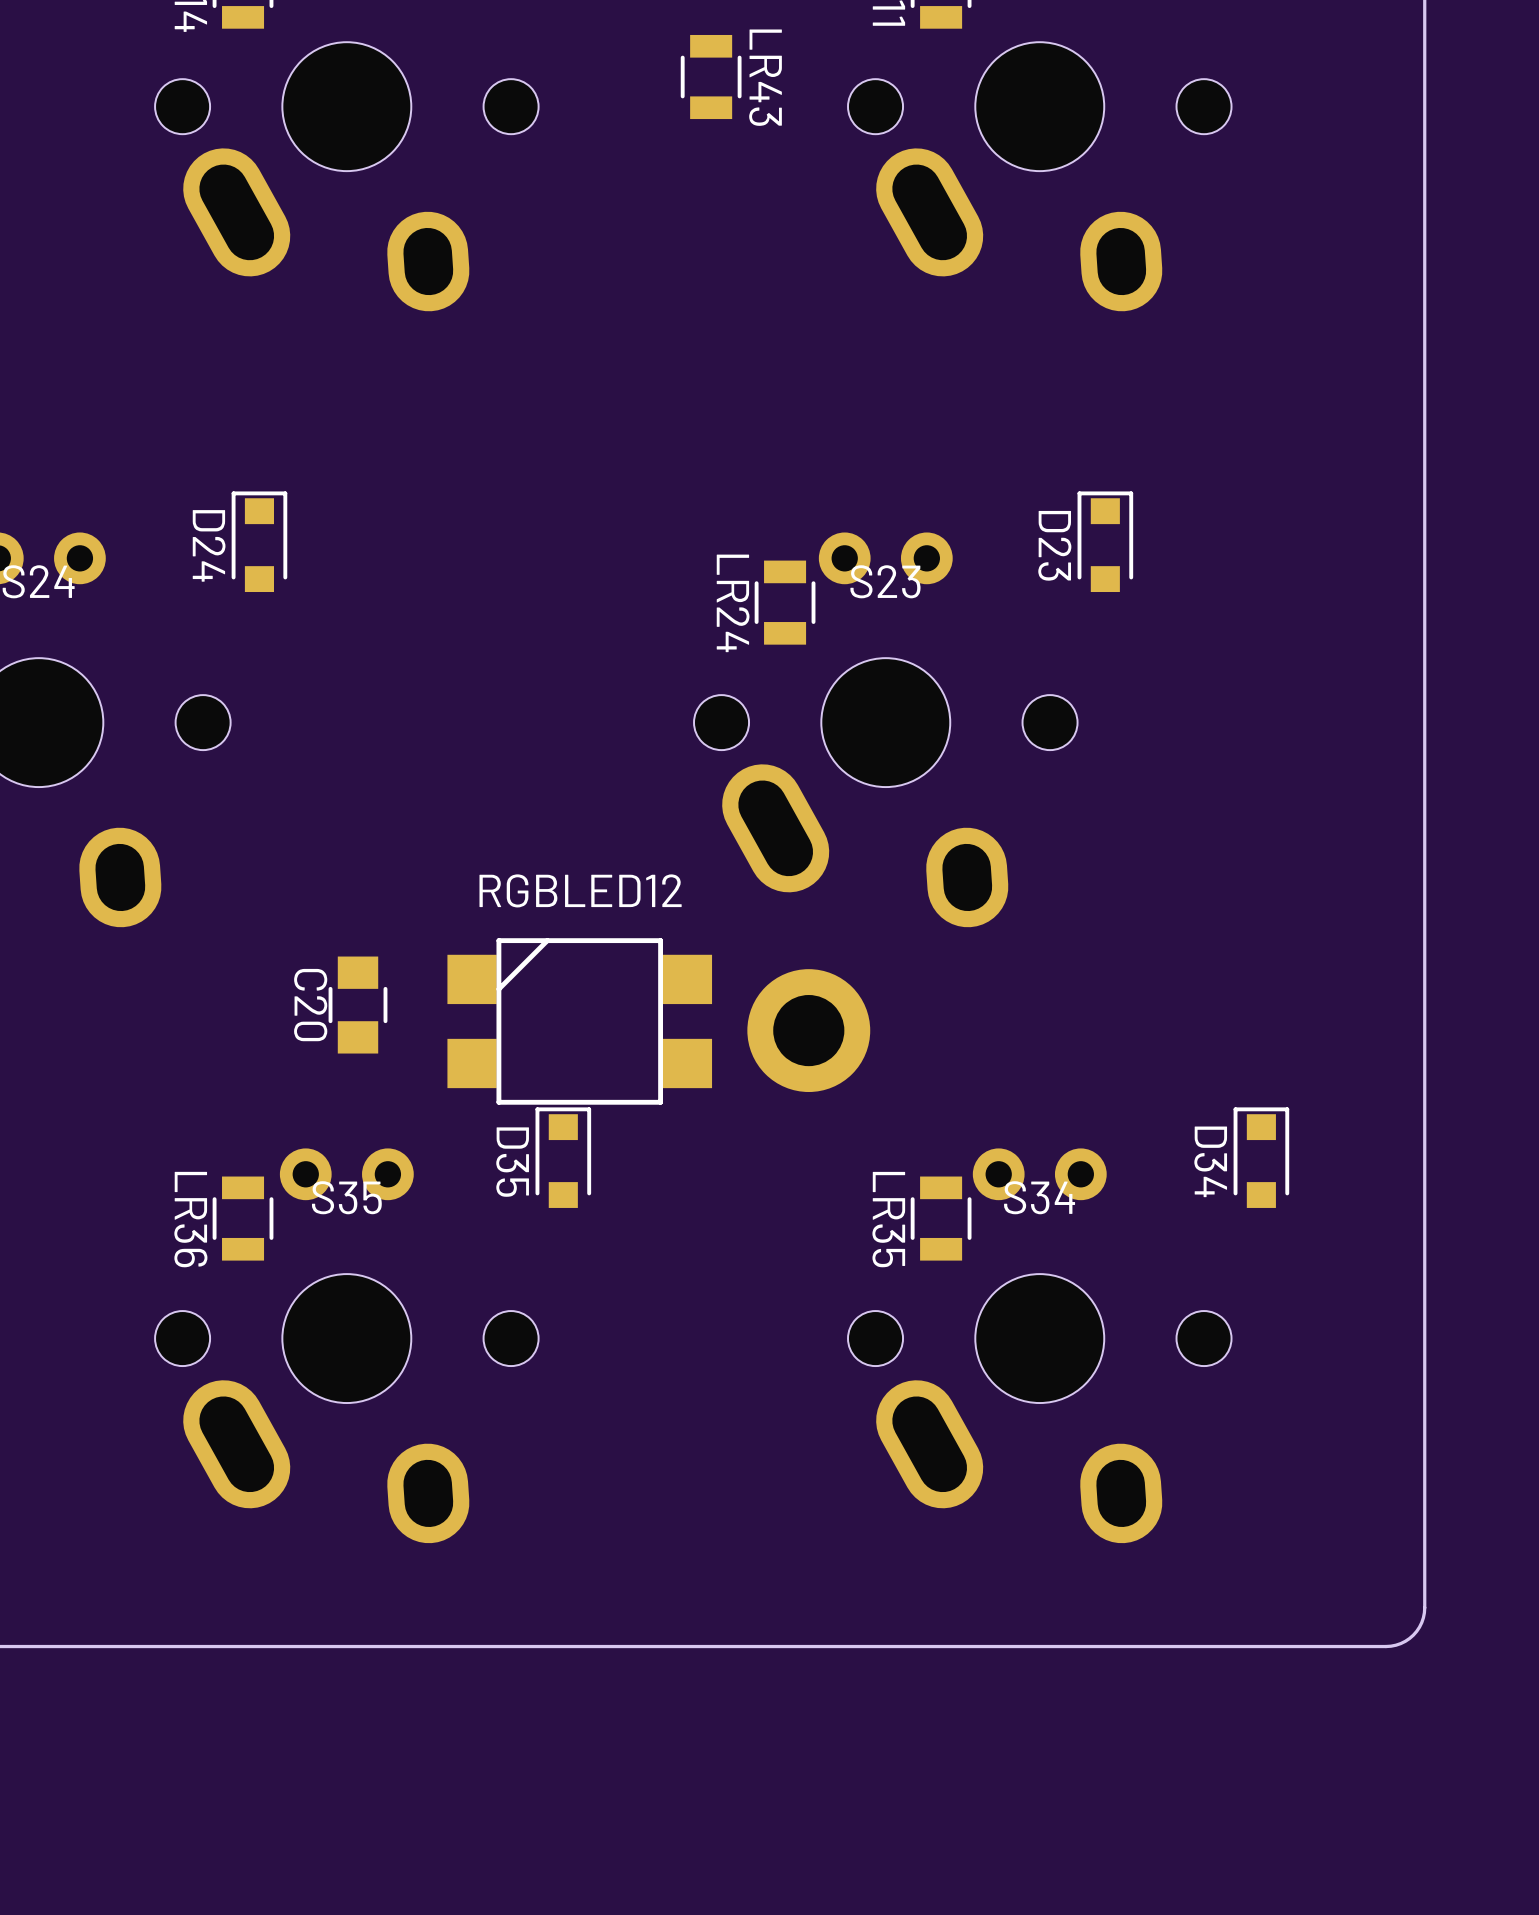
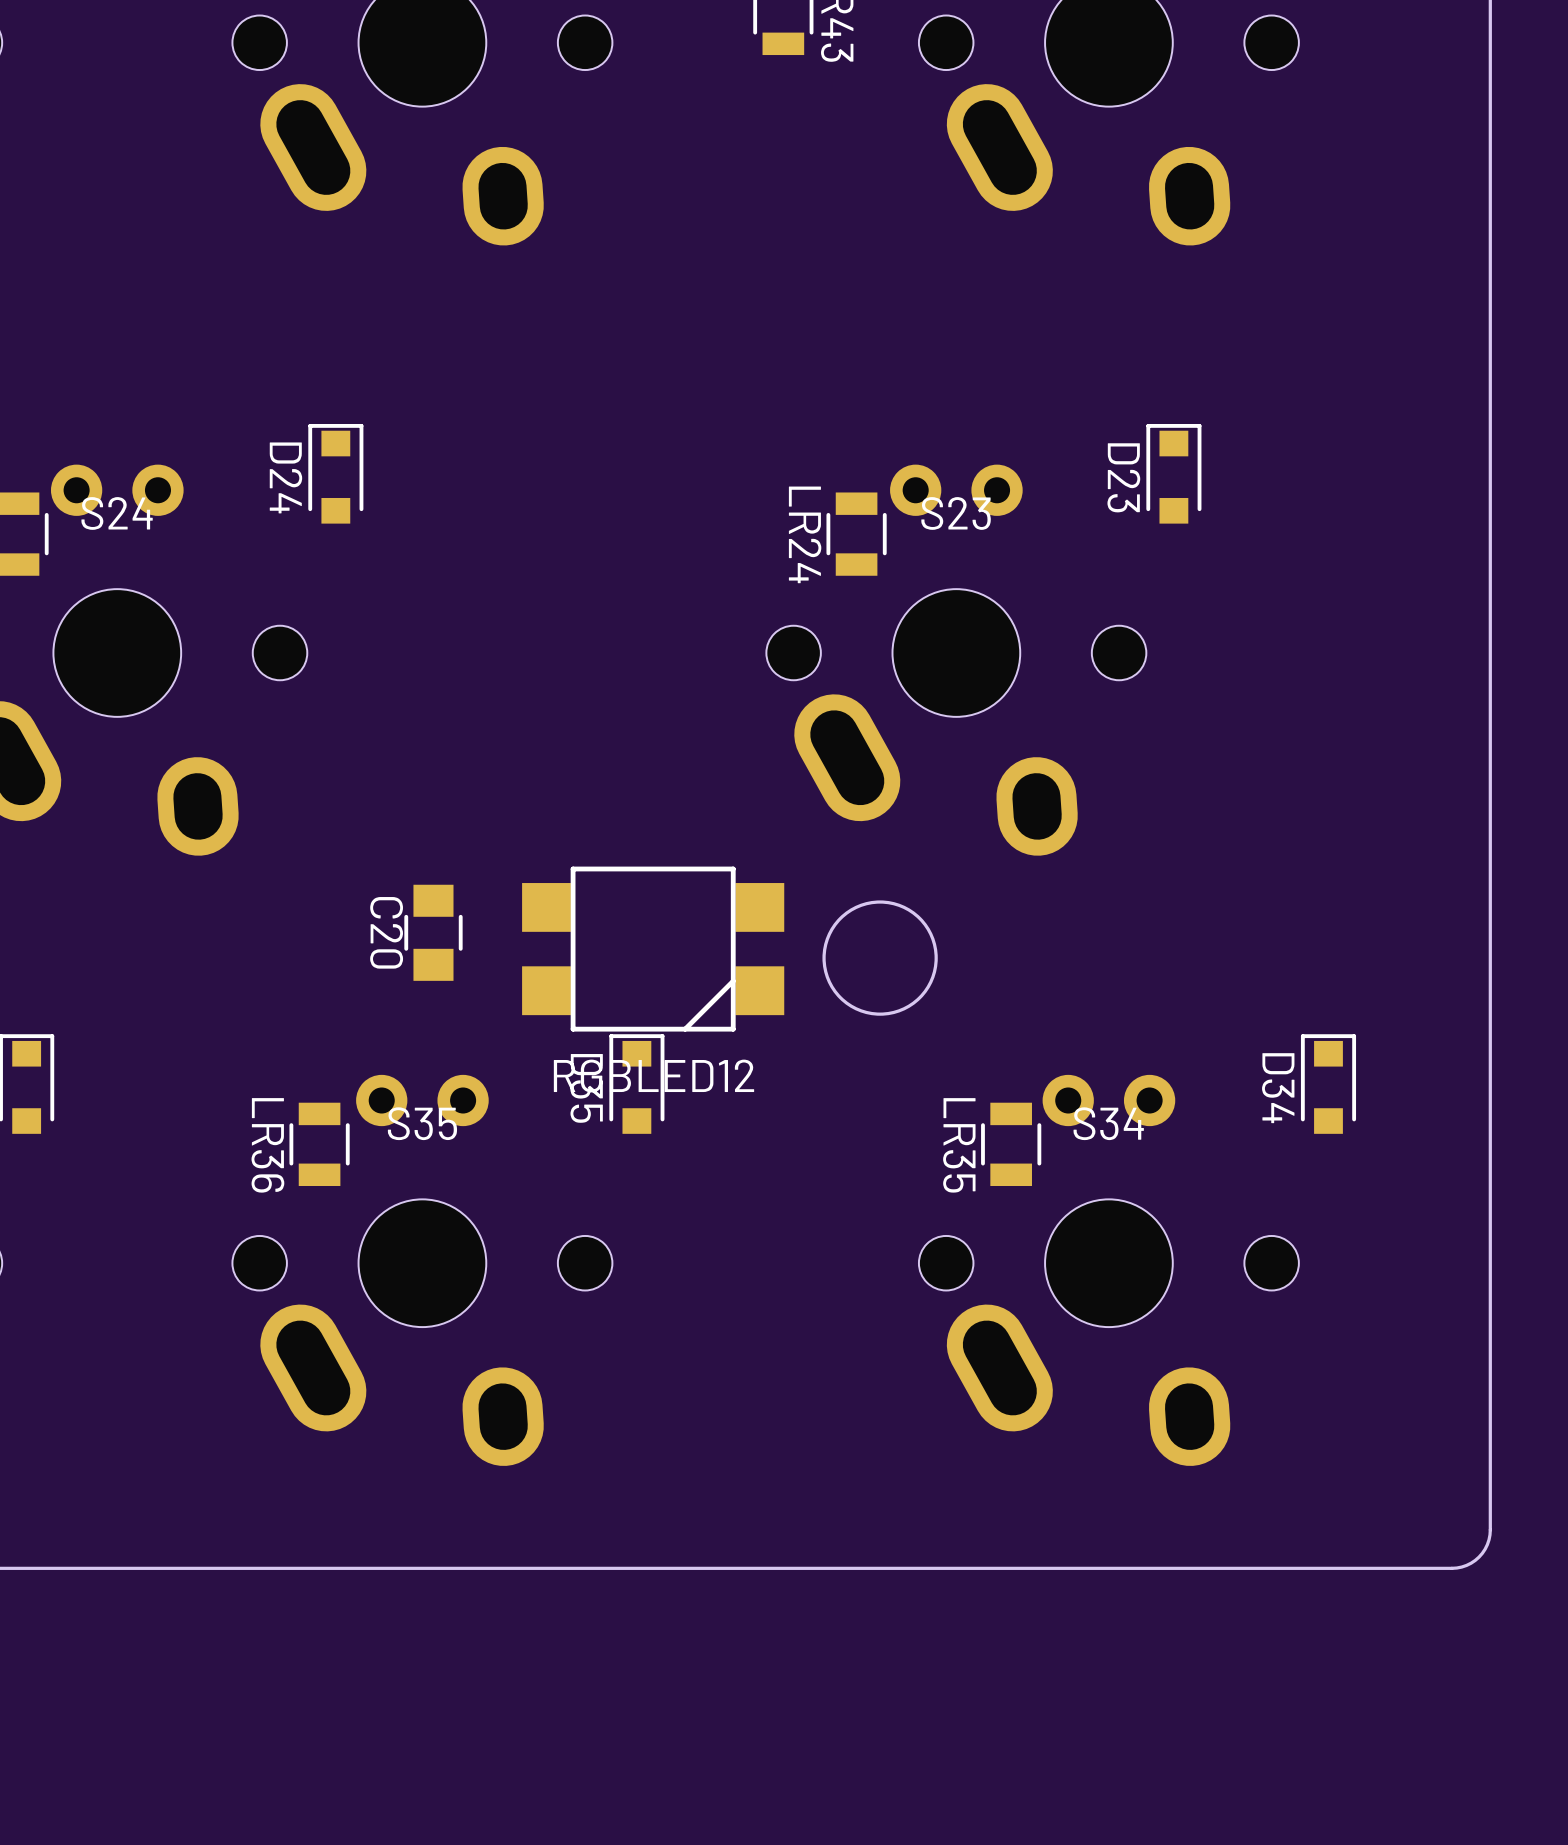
round board edge: none -> [822, 900, 938, 1016]
RGBLED12 rotation: 0° (579, 1021) -> 180° (653, 949)
part: (808, 1030) -> none

